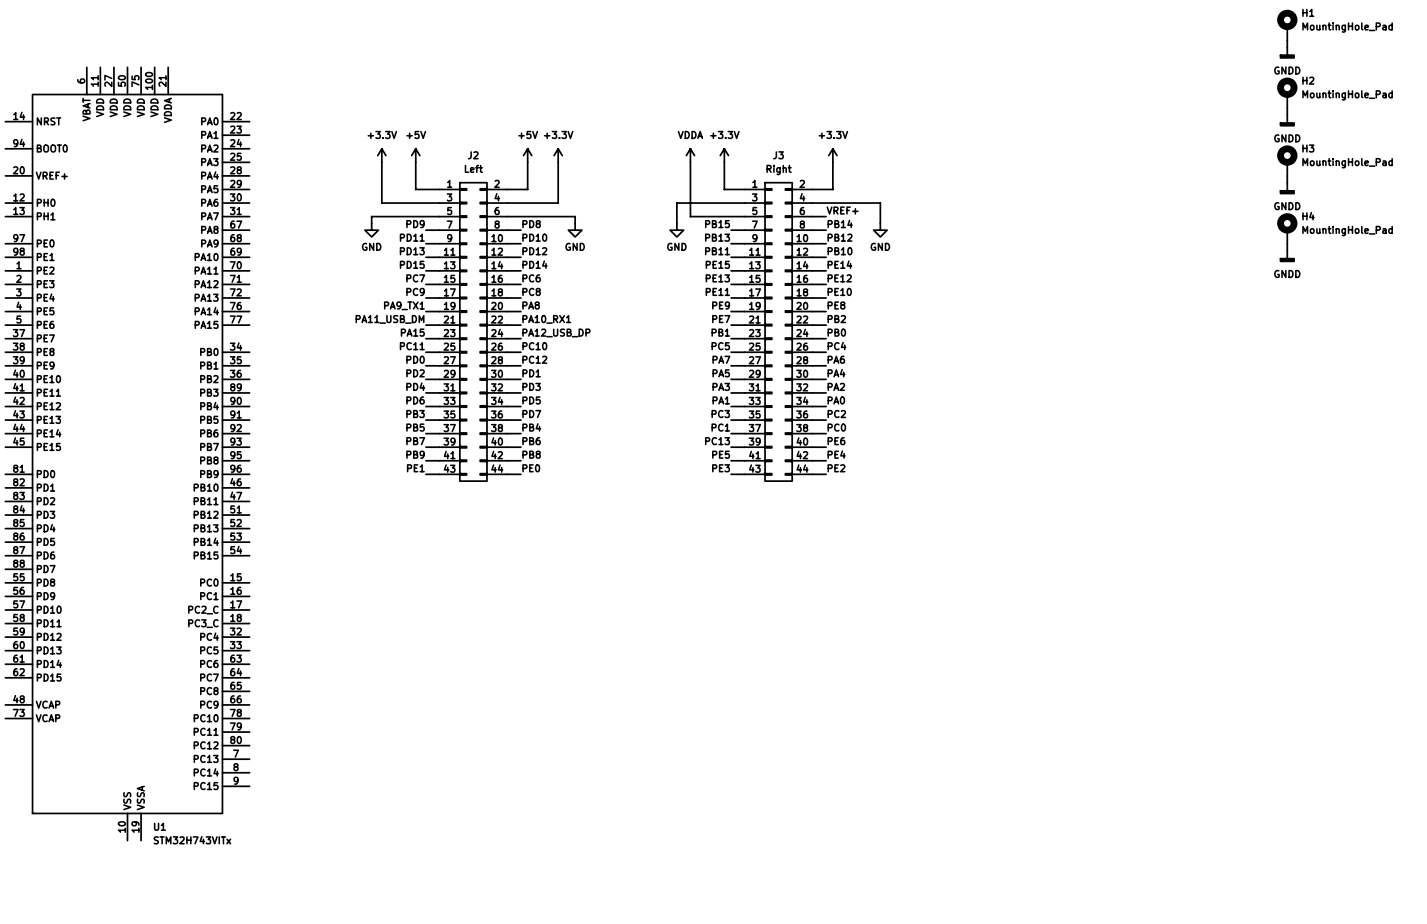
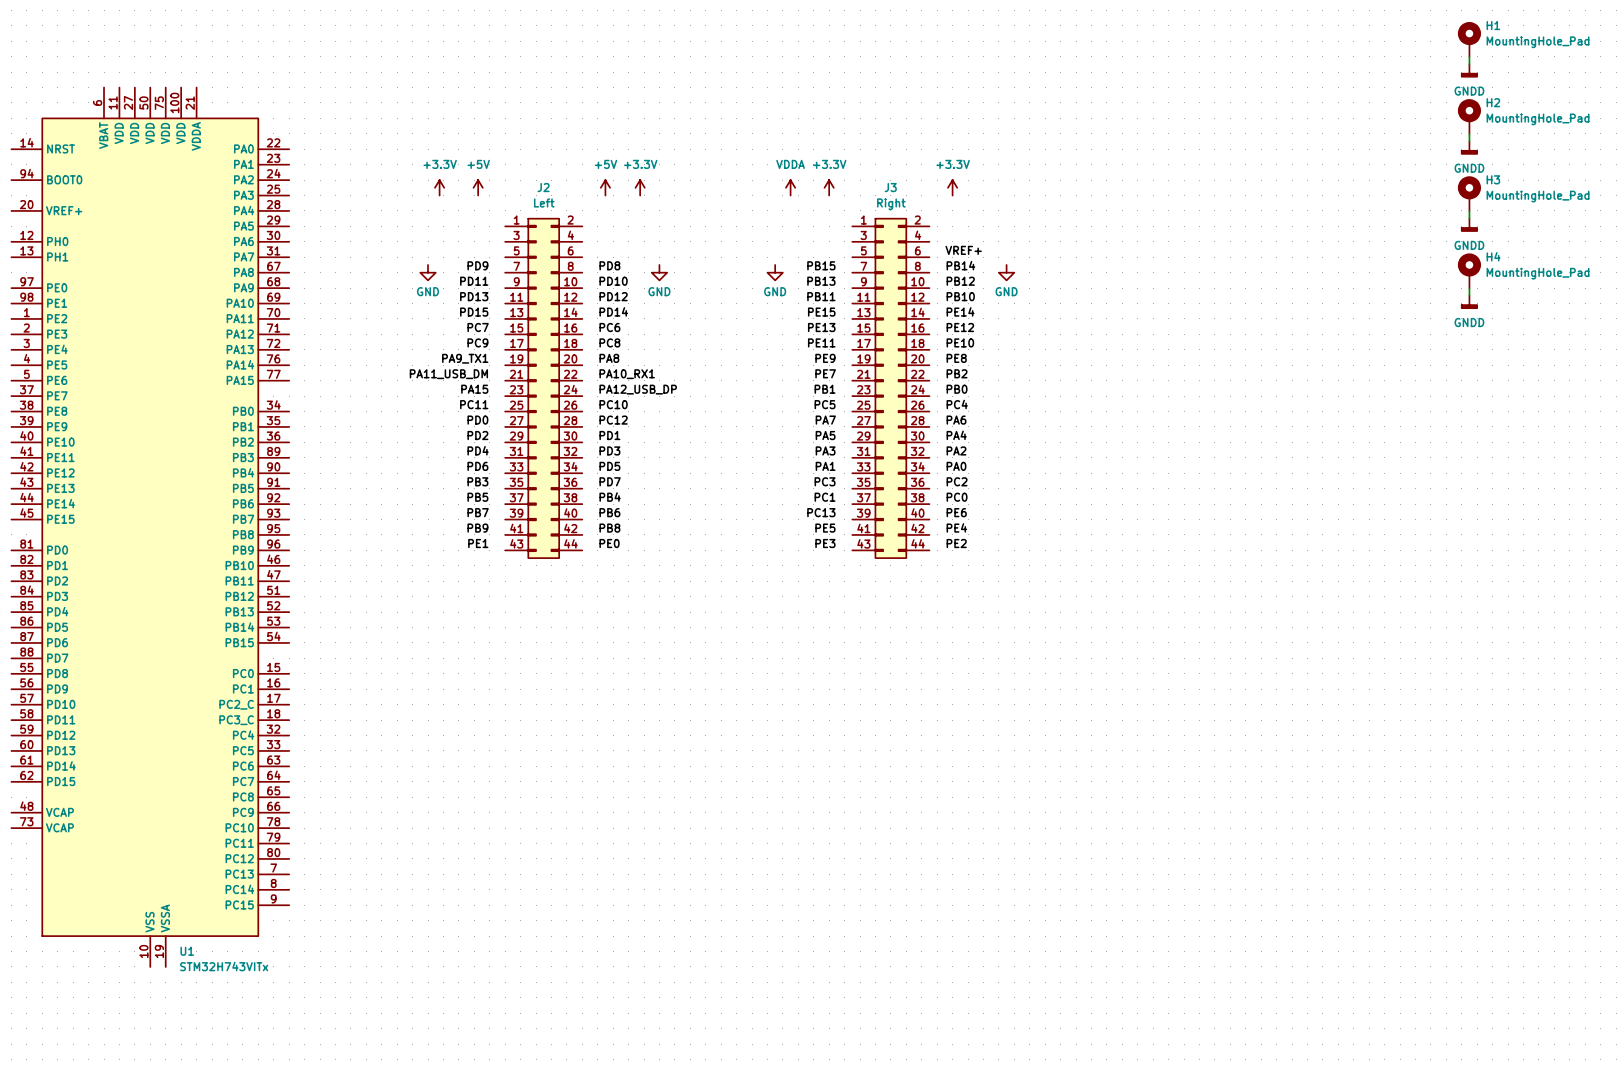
wire: (381, 162) (381, 203) (439, 203) -> none
wire: (415, 162) (415, 189) (439, 189) -> none
wire: (527, 162) (527, 189) (507, 189) -> none
wire: (558, 162) (558, 203) (507, 203) -> none
wire: (690, 162) (690, 216) (744, 216) -> none
wire: (724, 162) (724, 189) (744, 189) -> none
wire: (832, 162) (832, 189) (812, 189) -> none
wire: (744, 203) (676, 203) (676, 223) -> none
wire: (812, 203) (880, 203) (880, 223) -> none
wire: (439, 216) (371, 216) (371, 223) -> none
wire: (507, 216) (575, 216) (575, 223) -> none
wire: (812, 216) (826, 216) -> none
wire: (425, 230) (439, 230) -> none
wire: (507, 230) (520, 230) -> none
wire: (731, 230) (744, 230) -> none
wire: (812, 230) (826, 230) -> none
wire: (425, 243) (439, 243) -> none
wire: (507, 243) (520, 243) -> none
wire: (731, 243) (744, 243) -> none
wire: (812, 243) (826, 243) -> none
wire: (425, 257) (439, 257) -> none
wire: (507, 257) (520, 257) -> none
wire: (731, 257) (744, 257) -> none
wire: (812, 257) (826, 257) -> none
wire: (425, 270) (439, 270) -> none
wire: (507, 270) (520, 270) -> none
wire: (731, 270) (744, 270) -> none
wire: (812, 270) (826, 270) -> none
wire: (425, 284) (439, 284) -> none
wire: (507, 284) (520, 284) -> none
wire: (731, 284) (744, 284) -> none
wire: (812, 284) (826, 284) -> none
wire: (425, 297) (439, 297) -> none
wire: (507, 297) (520, 297) -> none
wire: (731, 297) (744, 297) -> none
wire: (812, 297) (826, 297) -> none
wire: (425, 311) (439, 311) -> none
wire: (507, 311) (520, 311) -> none
wire: (731, 311) (744, 311) -> none
wire: (812, 311) (826, 311) -> none
wire: (425, 325) (439, 325) -> none
wire: (507, 325) (520, 325) -> none
wire: (731, 325) (744, 325) -> none
wire: (812, 325) (826, 325) -> none
wire: (425, 338) (439, 338) -> none
wire: (507, 338) (520, 338) -> none
wire: (731, 338) (744, 338) -> none
wire: (812, 338) (826, 338) -> none
wire: (425, 352) (439, 352) -> none
wire: (507, 352) (520, 352) -> none
wire: (731, 352) (744, 352) -> none
wire: (812, 352) (826, 352) -> none
wire: (425, 365) (439, 365) -> none
wire: (507, 365) (520, 365) -> none
wire: (731, 365) (744, 365) -> none
wire: (812, 365) (826, 365) -> none
wire: (425, 379) (439, 379) -> none
wire: (507, 379) (520, 379) -> none
wire: (731, 379) (744, 379) -> none
wire: (812, 379) (826, 379) -> none
wire: (425, 392) (439, 392) -> none
wire: (507, 392) (520, 392) -> none
wire: (731, 392) (744, 392) -> none
wire: (812, 392) (826, 392) -> none
wire: (425, 406) (439, 406) -> none
wire: (507, 406) (520, 406) -> none
wire: (731, 406) (744, 406) -> none
wire: (812, 406) (826, 406) -> none
wire: (425, 420) (439, 420) -> none
wire: (507, 420) (520, 420) -> none
wire: (731, 420) (744, 420) -> none
wire: (812, 420) (826, 420) -> none
wire: (425, 433) (439, 433) -> none
wire: (507, 433) (520, 433) -> none
wire: (731, 433) (744, 433) -> none
wire: (812, 433) (826, 433) -> none
wire: (425, 447) (439, 447) -> none
wire: (507, 447) (520, 447) -> none
wire: (731, 447) (744, 447) -> none
wire: (812, 447) (826, 447) -> none
wire: (425, 460) (439, 460) -> none
wire: (507, 460) (520, 460) -> none
wire: (731, 460) (744, 460) -> none
wire: (812, 460) (826, 460) -> none
wire: (425, 474) (439, 474) -> none
wire: (507, 474) (520, 474) -> none
wire: (731, 474) (744, 474) -> none
wire: (812, 474) (826, 474) -> none

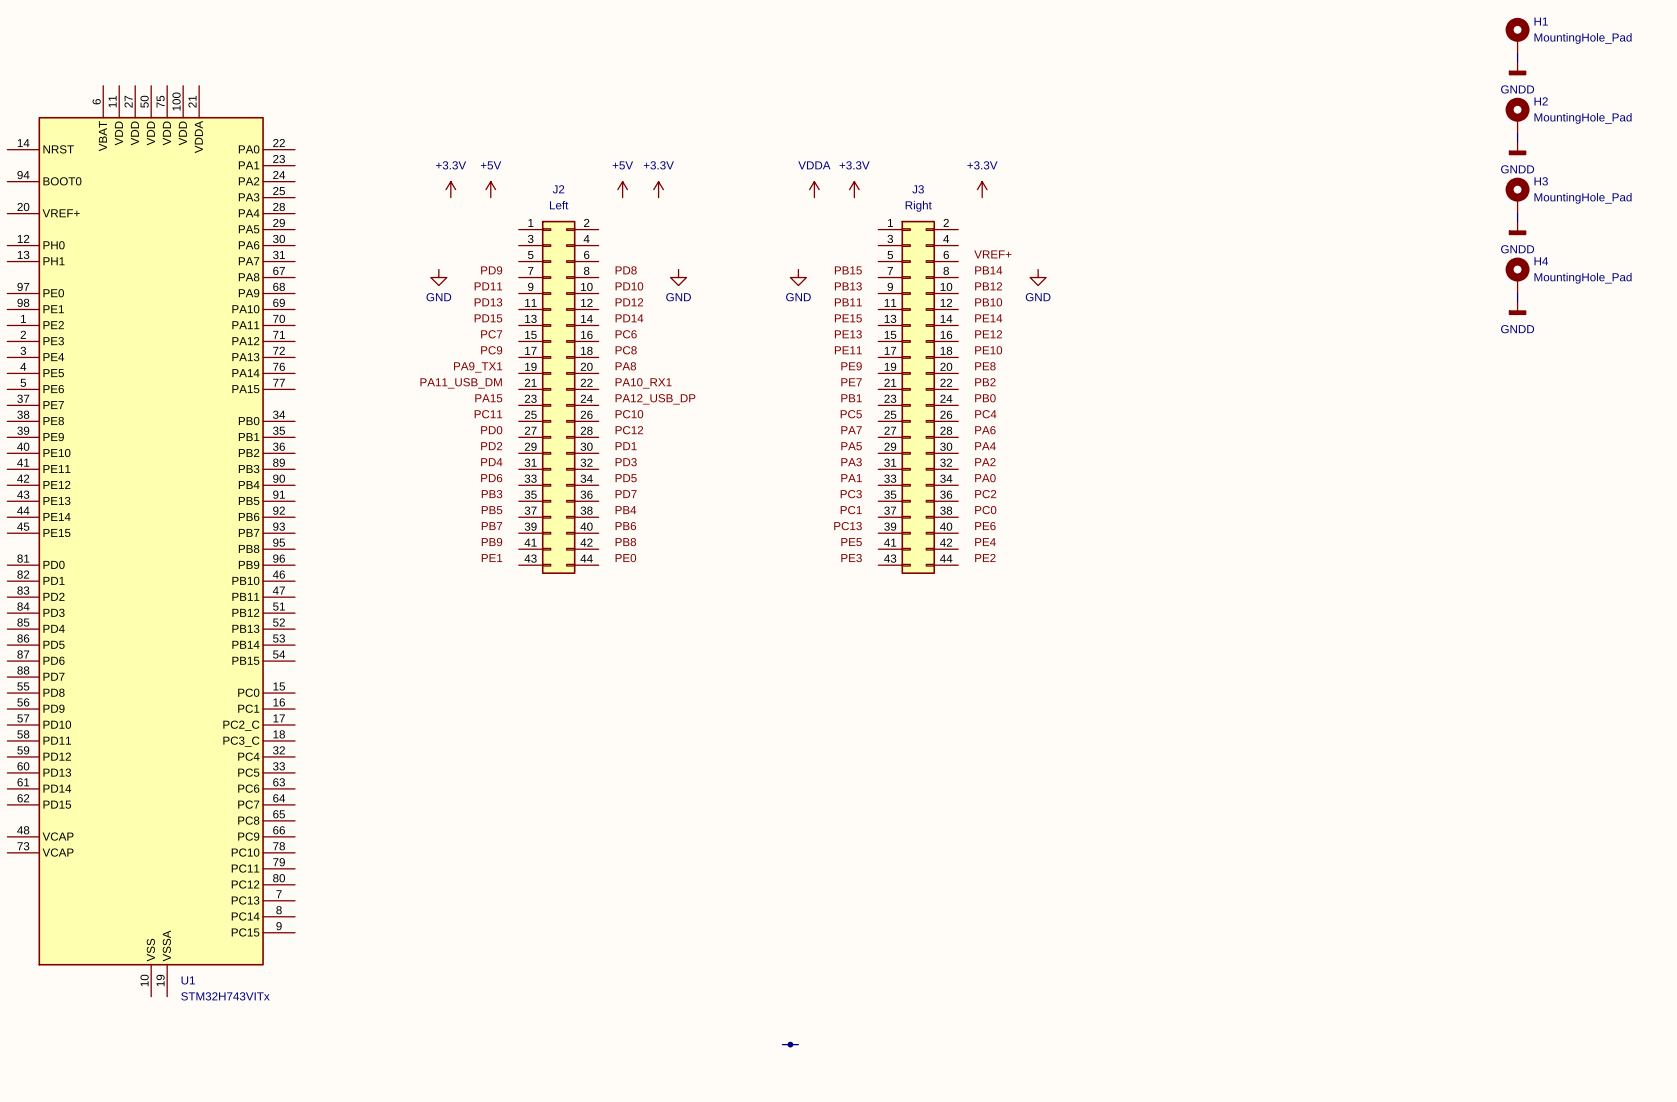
wire: none -> (782, 1044) (798, 1044)
junction: none -> (790, 1044)

